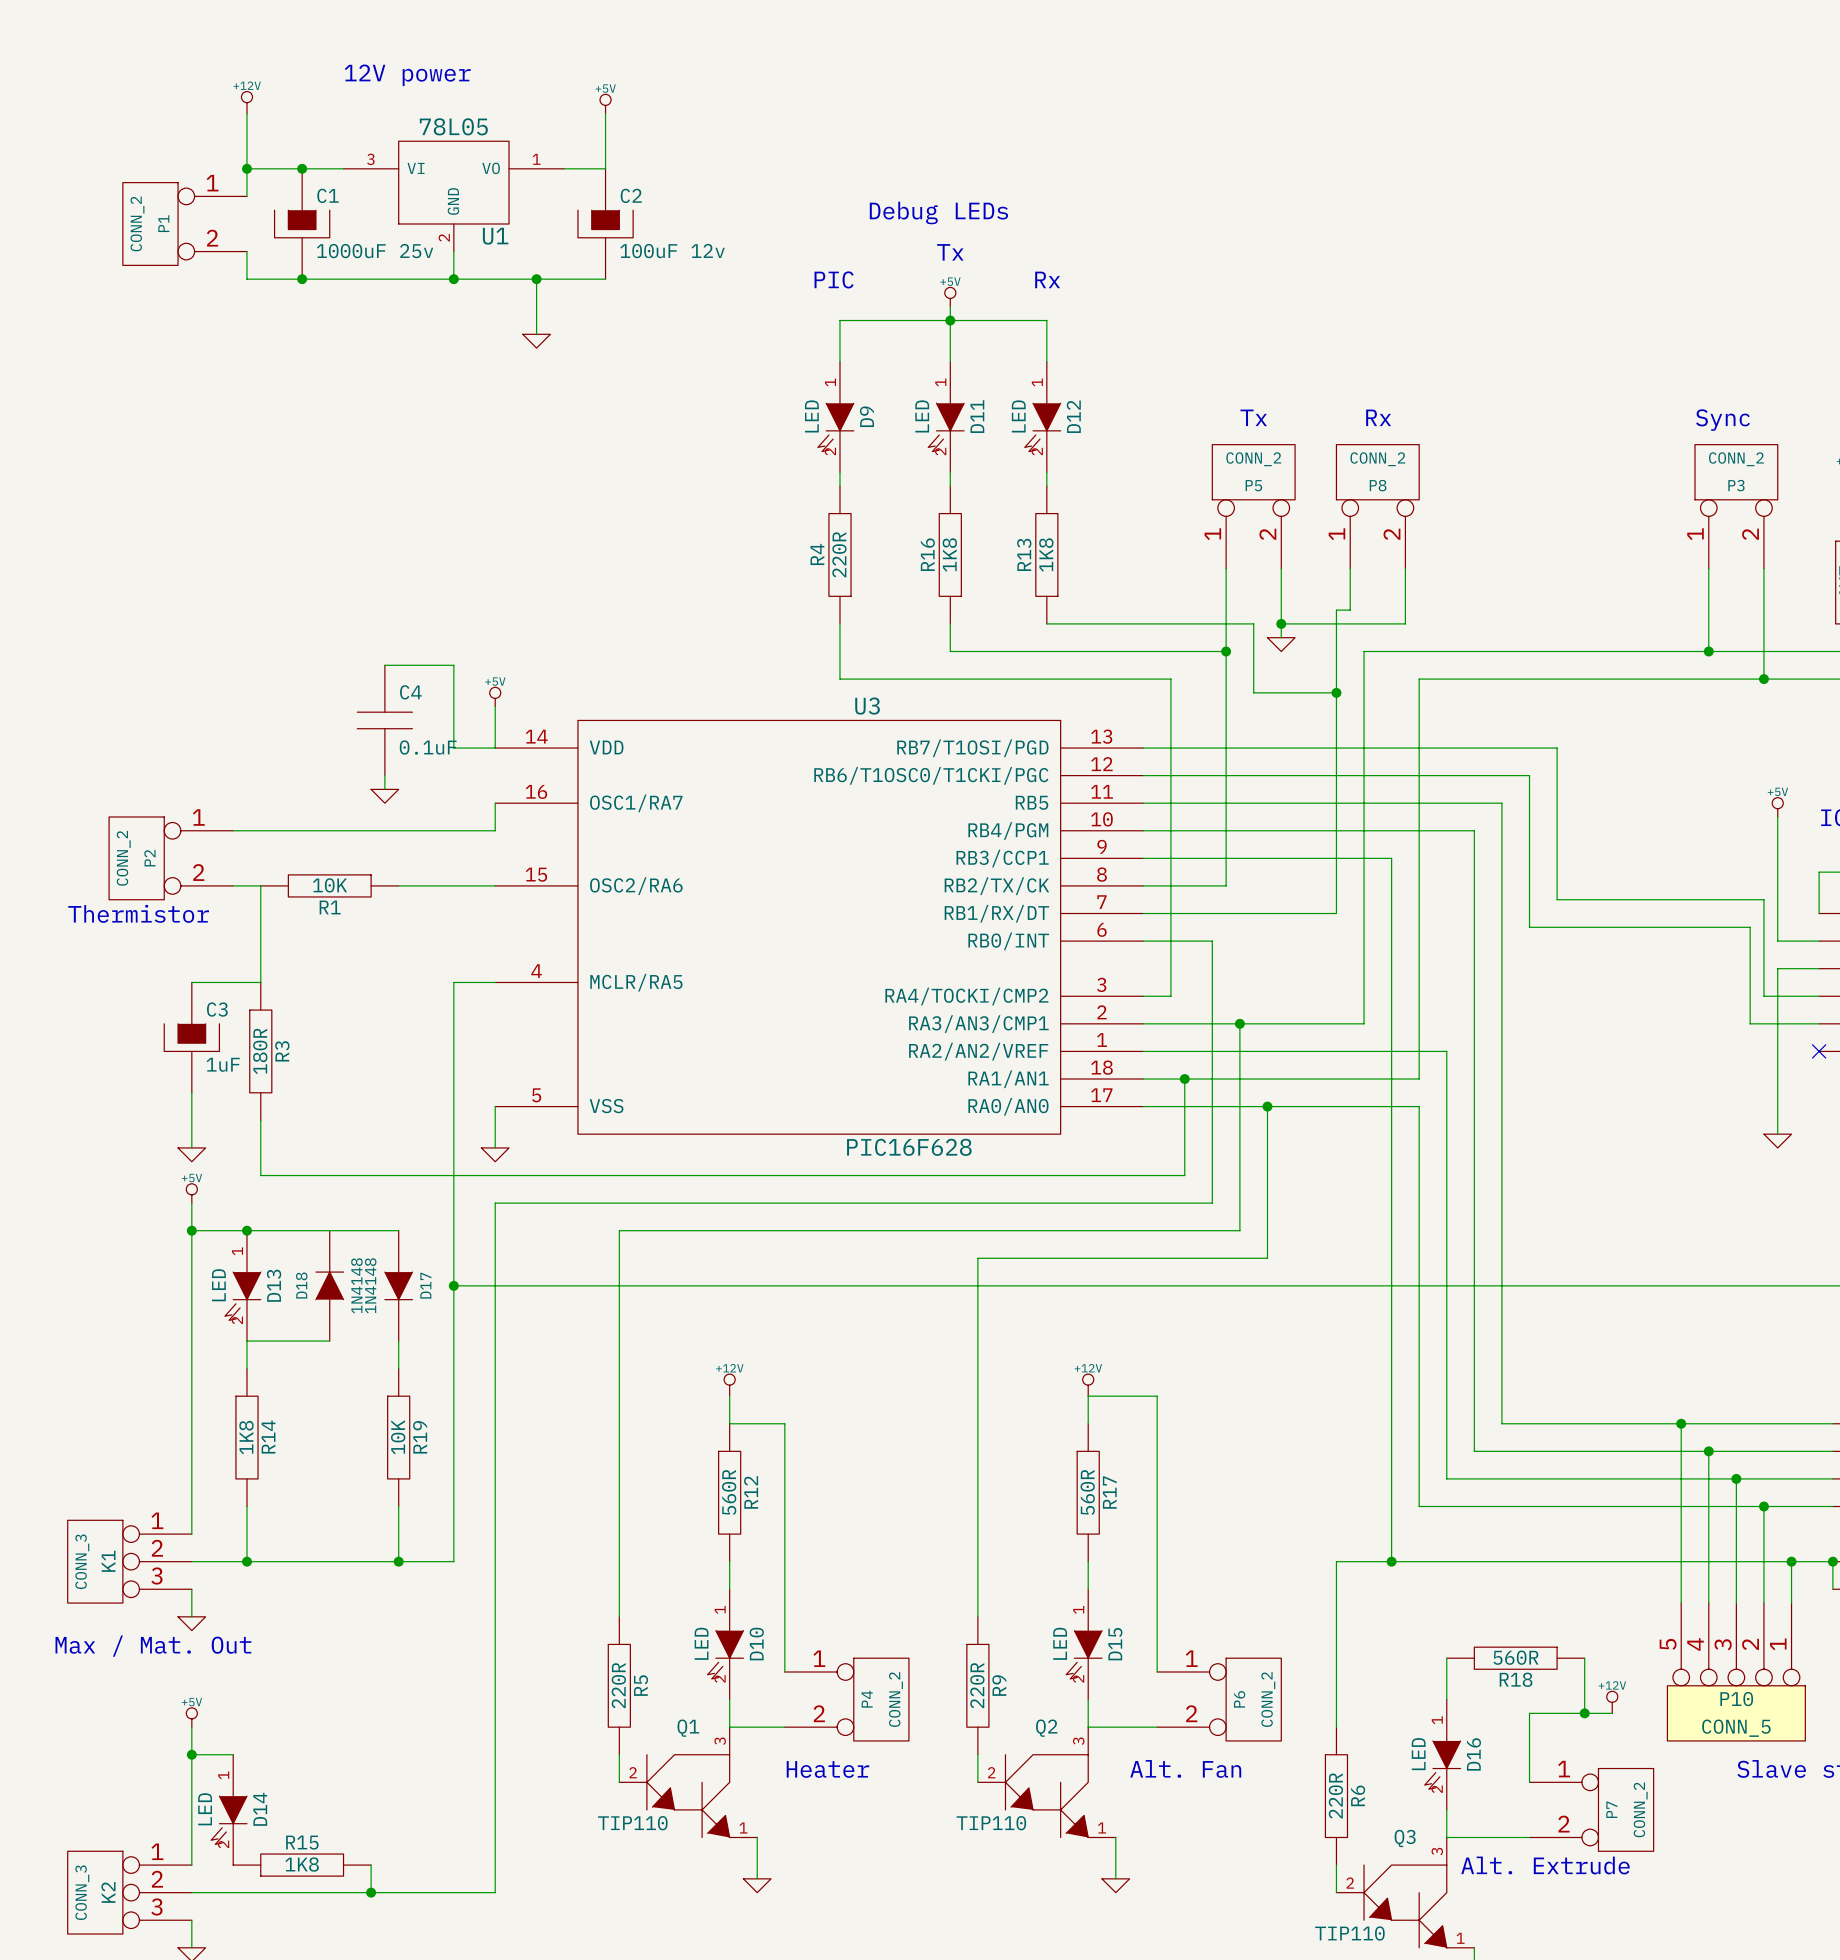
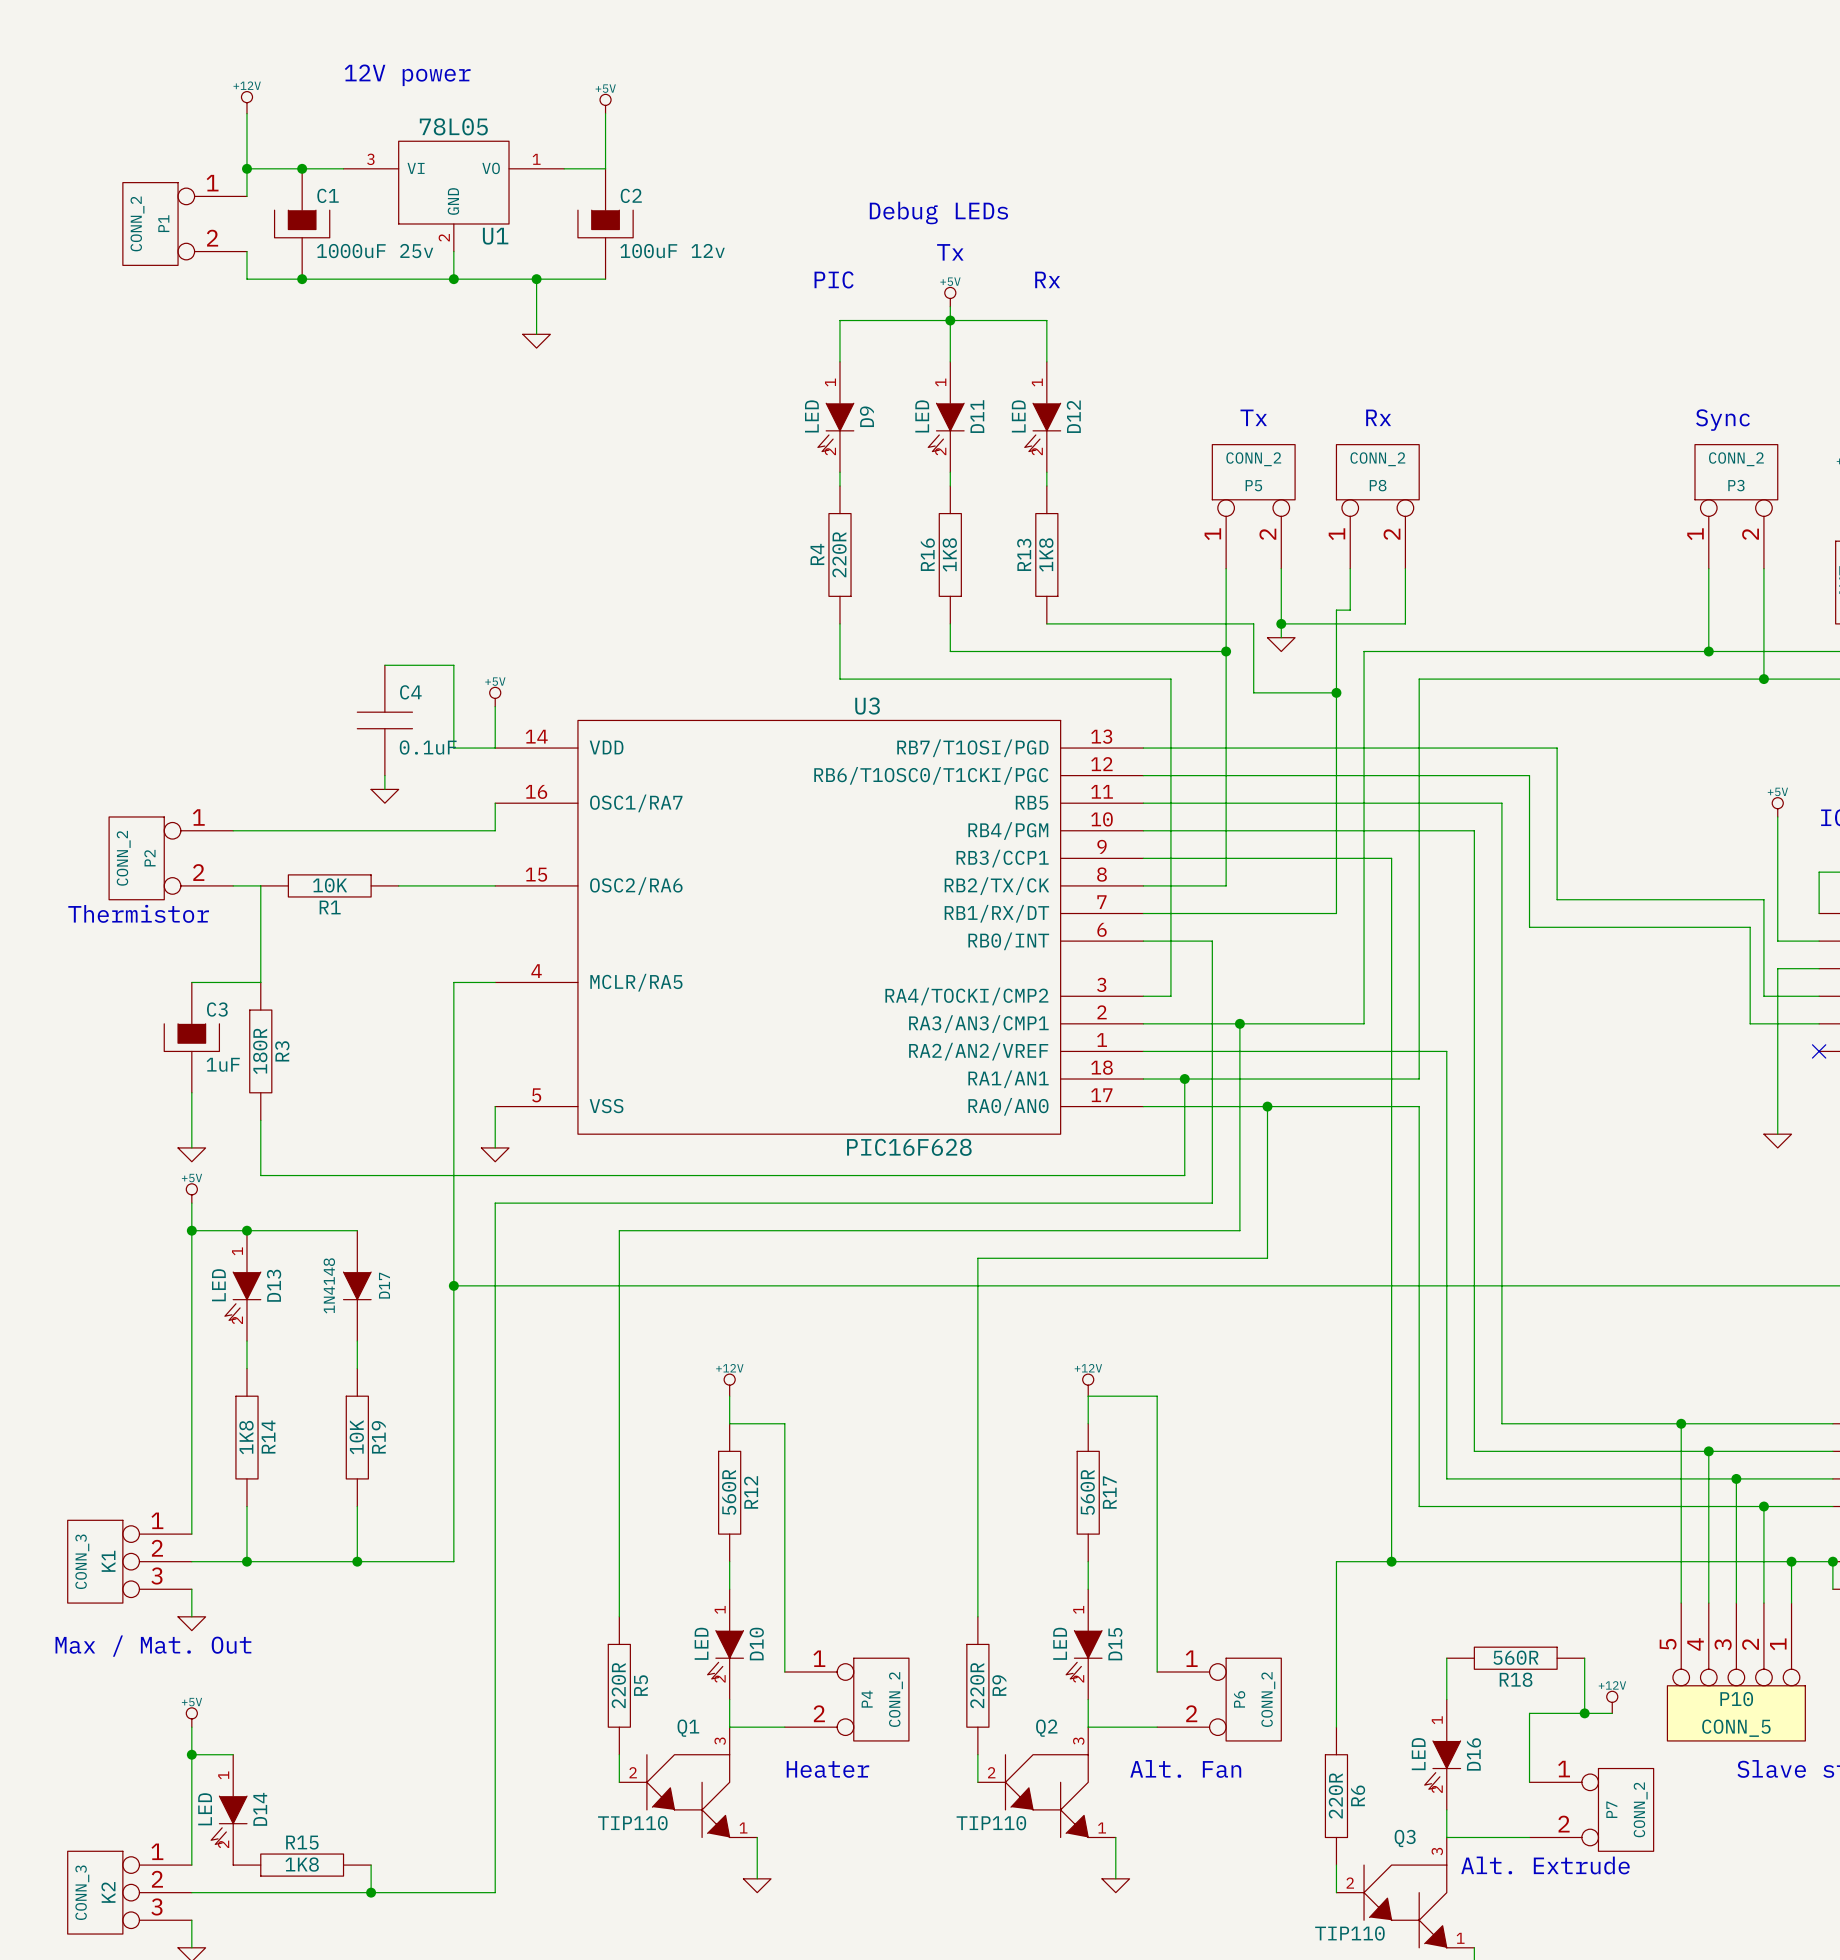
wire: (357, 1230) (398, 1230) -> none
D18: 1N4148 (329, 1285) -> none
D17 position: (398, 1285) -> (357, 1285)
wire: (246, 1341) (329, 1341) -> none
wire: (398, 1341) (398, 1368) -> (357, 1341) (357, 1368)
R19 position: (398, 1437) -> (357, 1437)
wire: (398, 1506) (398, 1561) -> (357, 1506) (357, 1561)
junction position: (398, 1561) -> (357, 1561)

